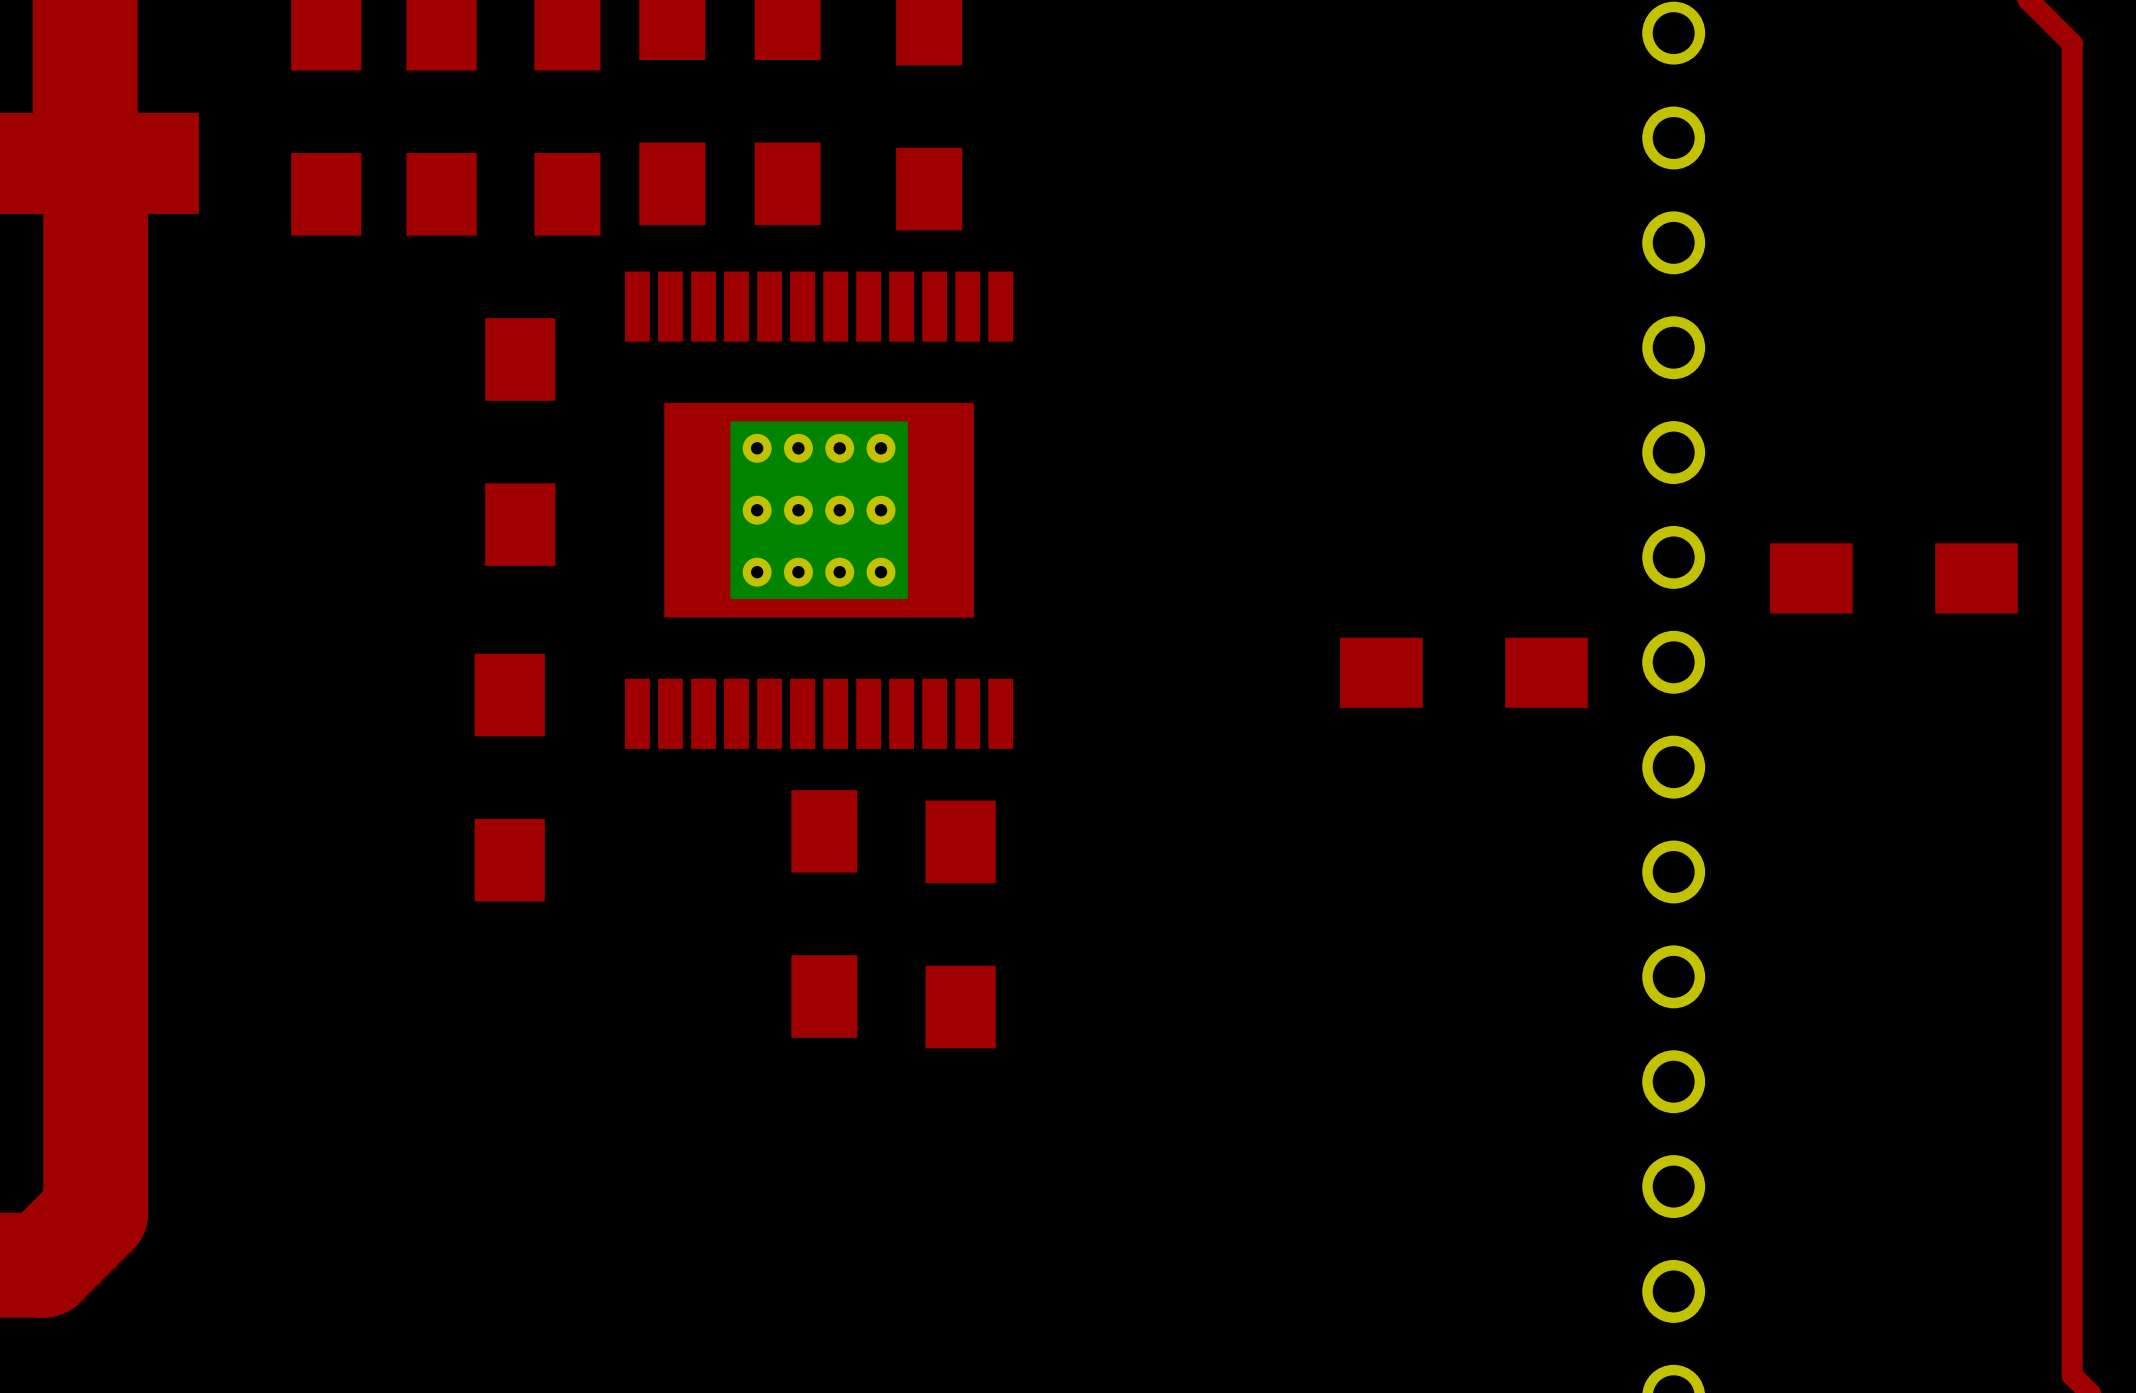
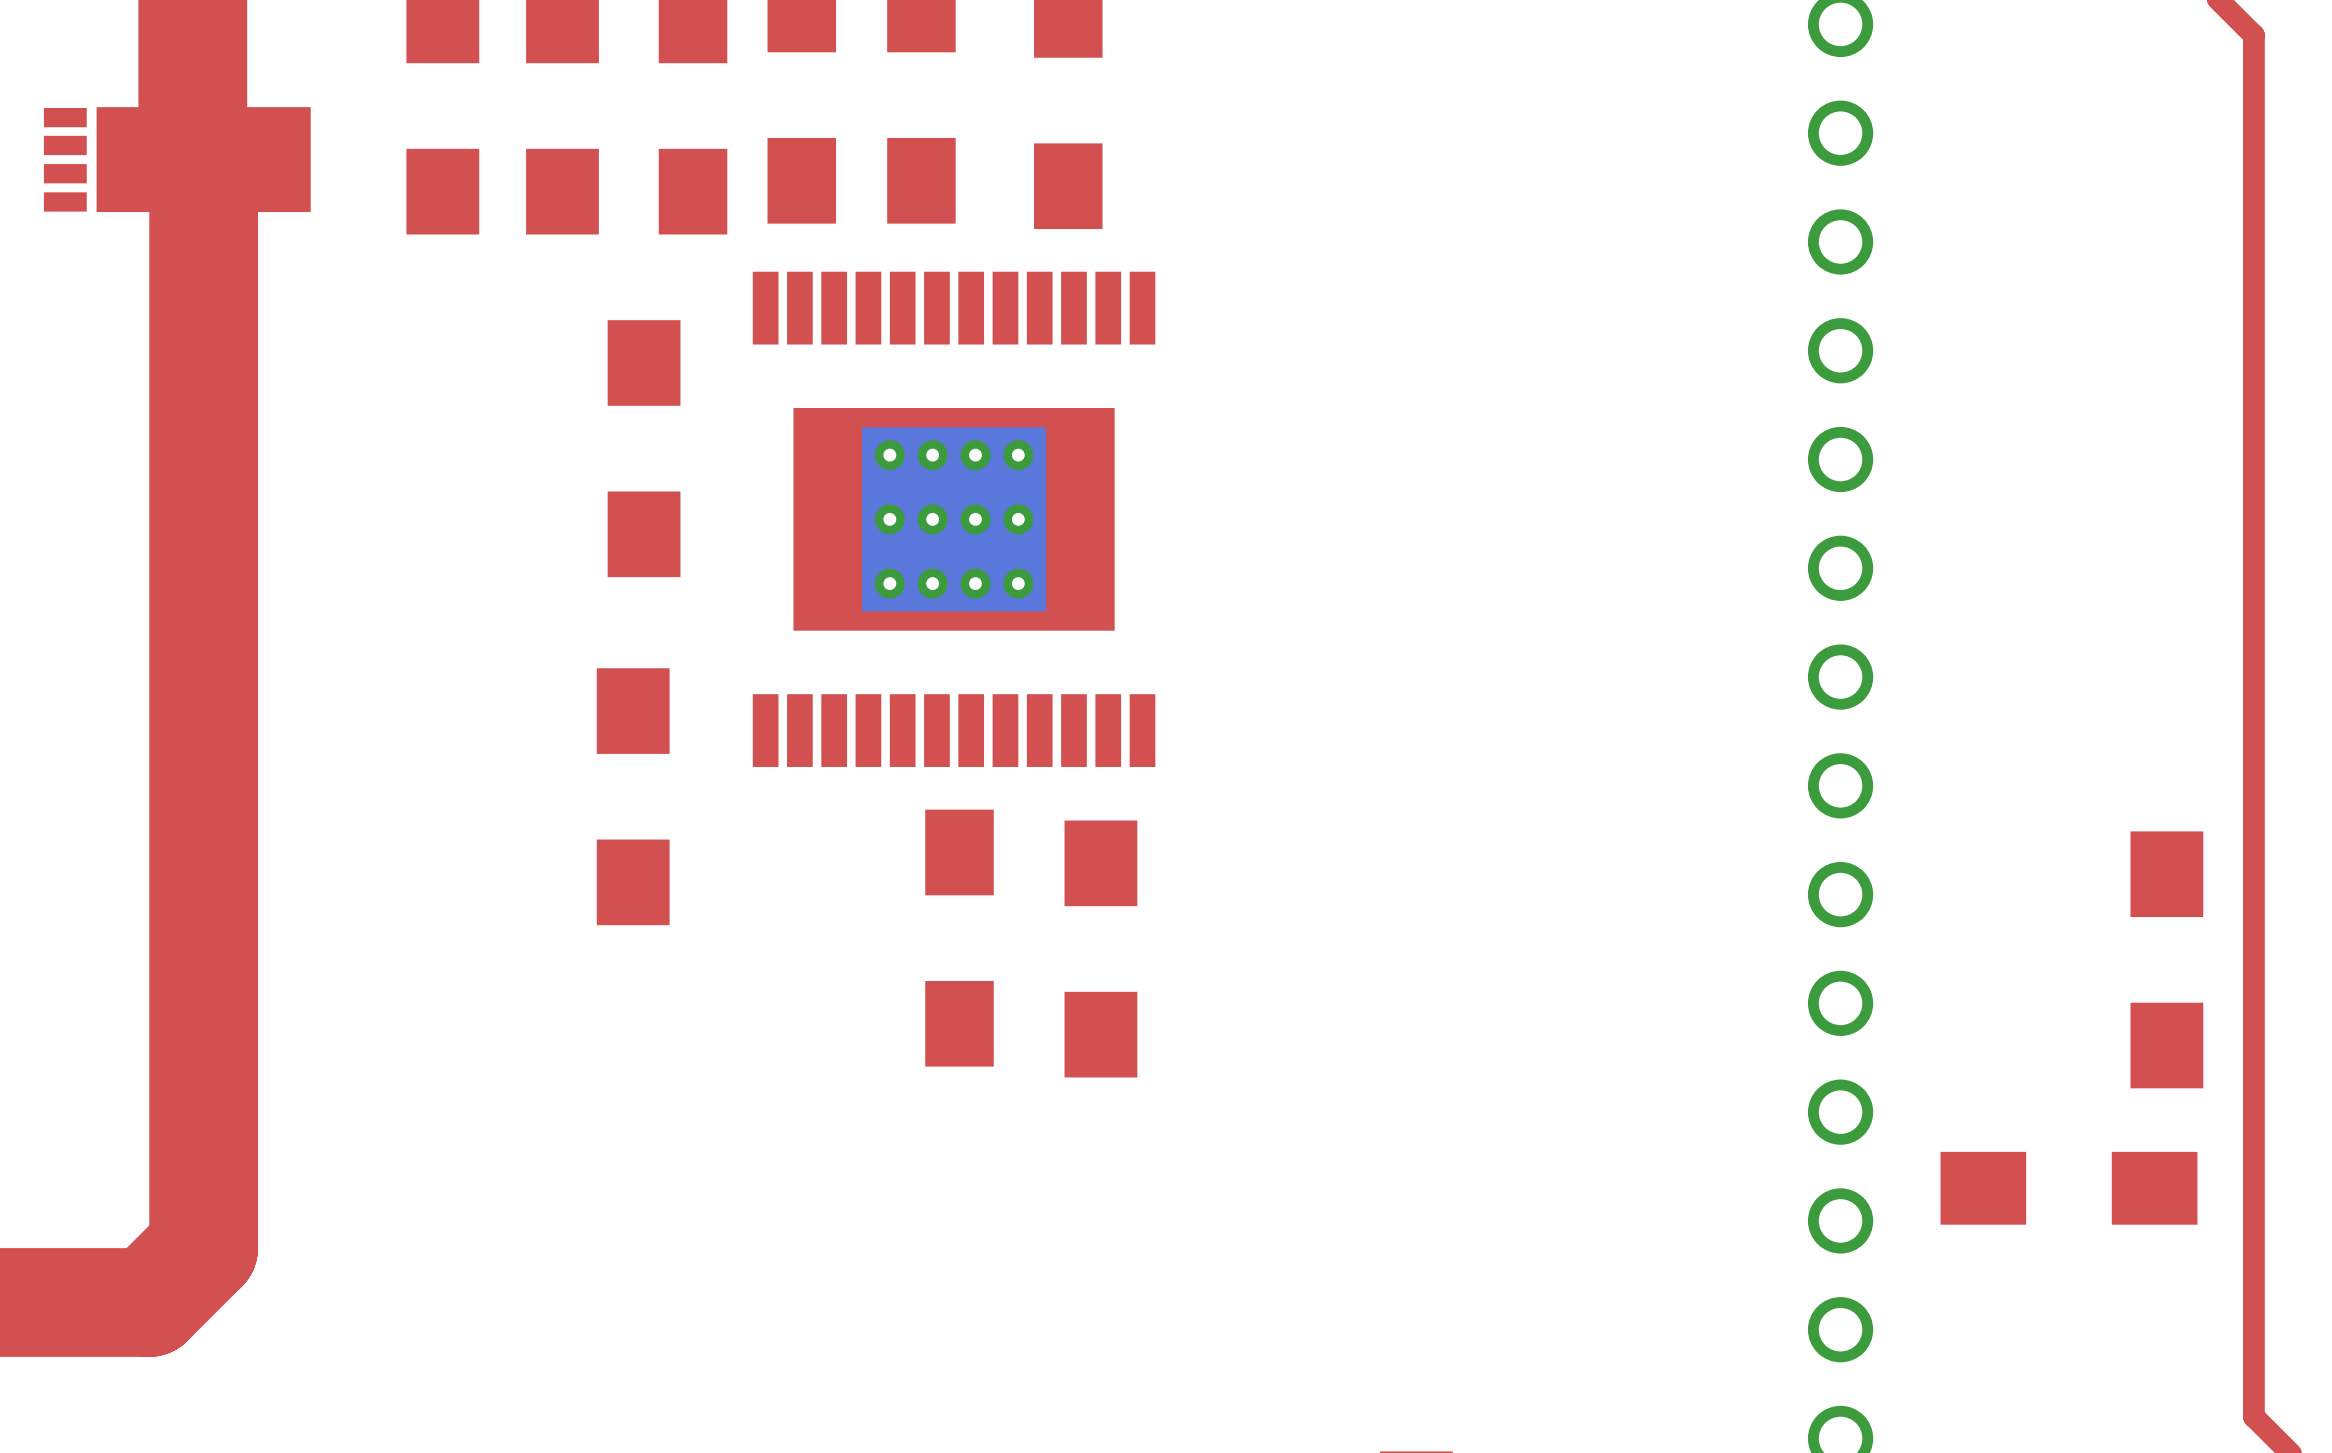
part: (1893, 578) -> none
part: (1463, 672) -> none
part: none -> (2166, 959)
part: none -> (2068, 1188)

